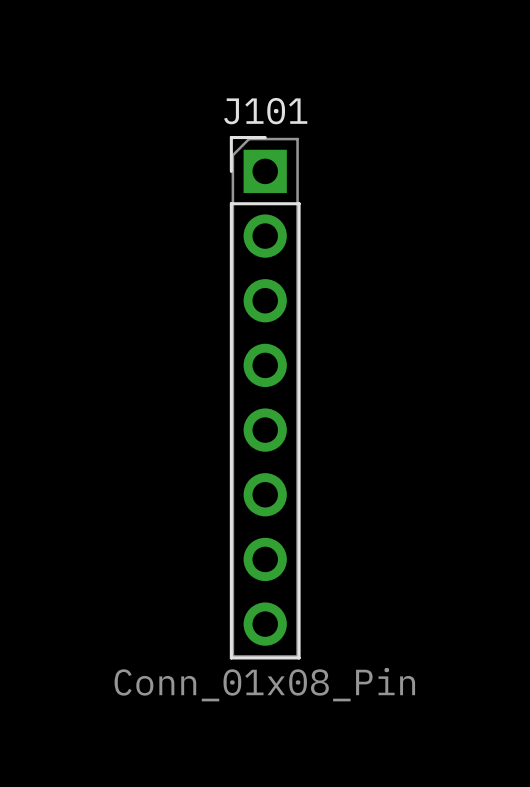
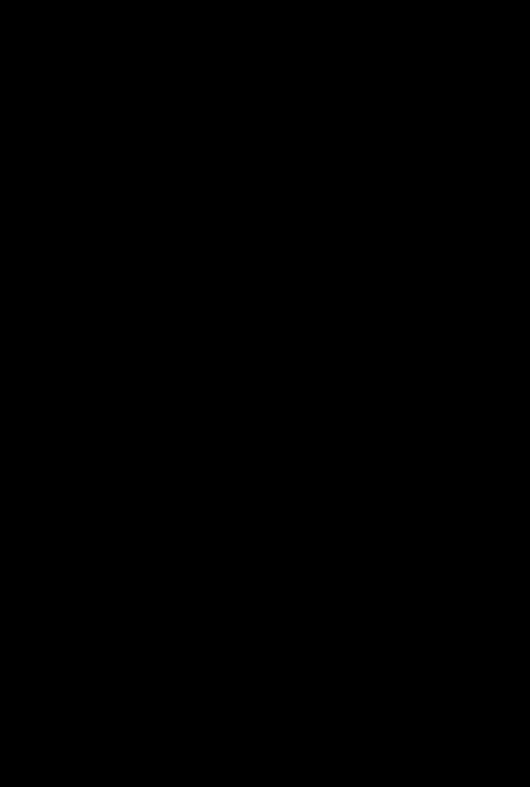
J101: Conn_01x08_Pin (265, 397) -> none

